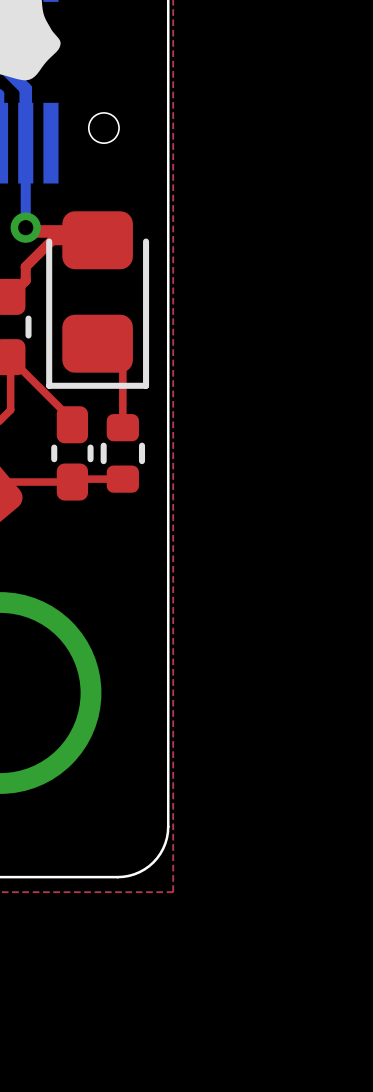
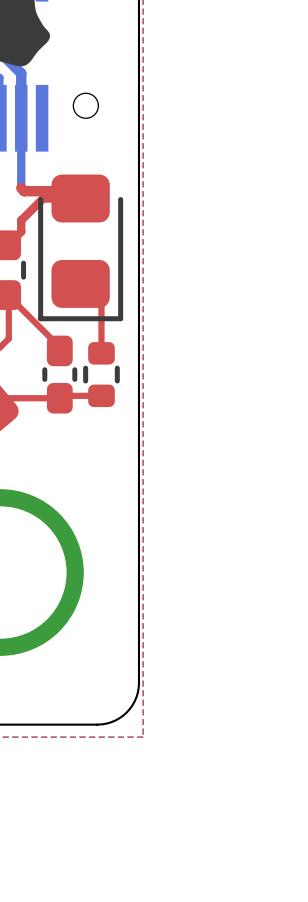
via: (25, 227) -> none

